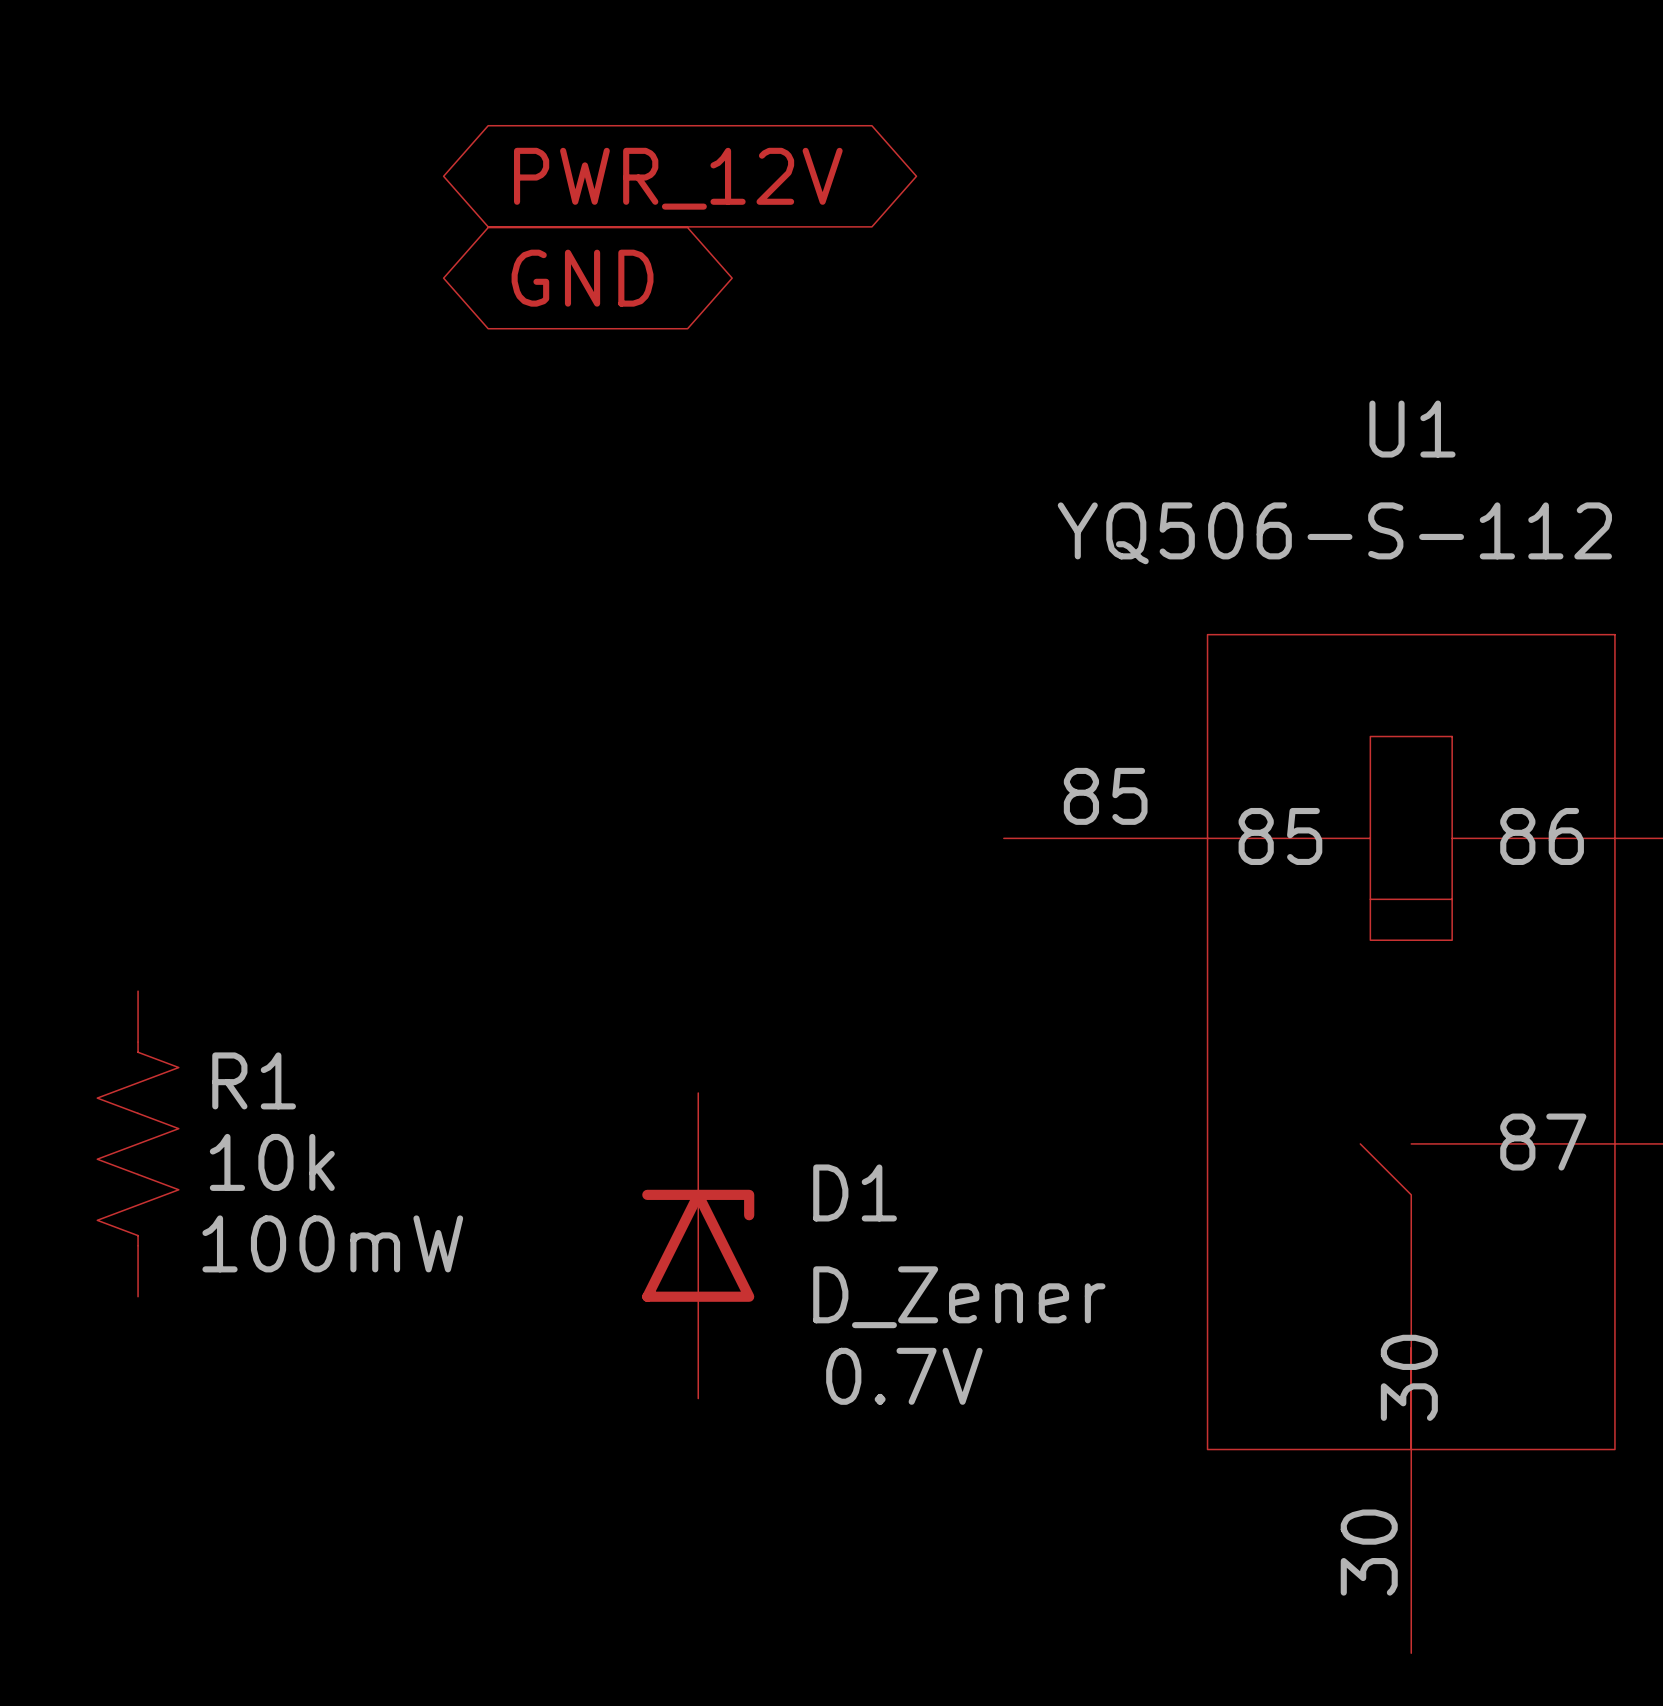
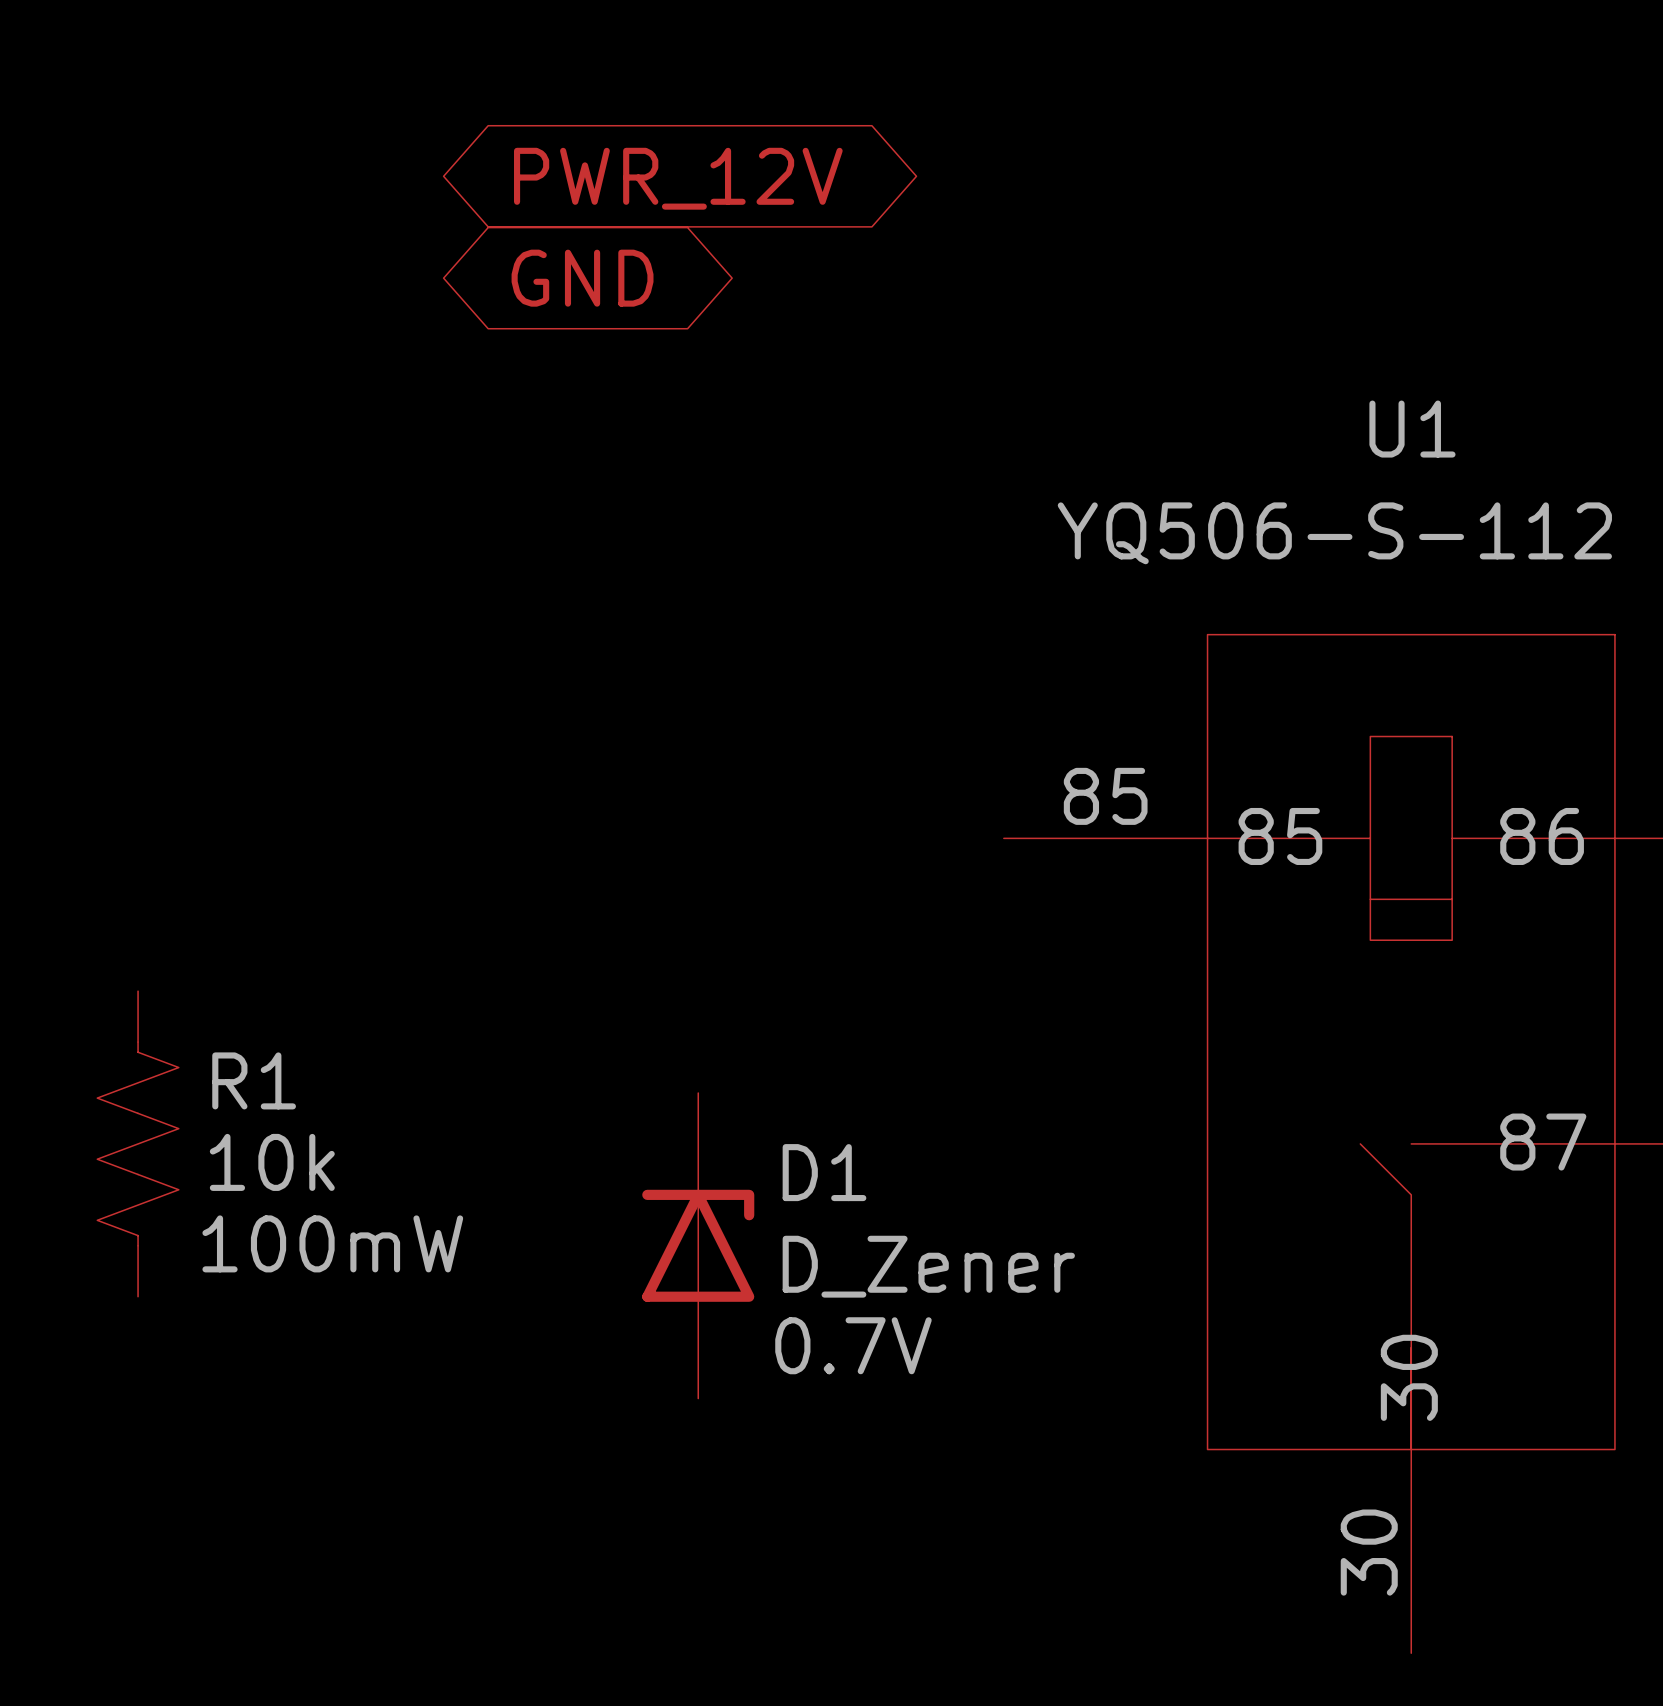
D1 name position: D1 (855, 1192) -> D1 (824, 1172)
D1 value position: D_Zener (959, 1297) -> D_Zener (928, 1266)
D1 text position: 0.7V (904, 1376) -> 0.7V (853, 1345)

